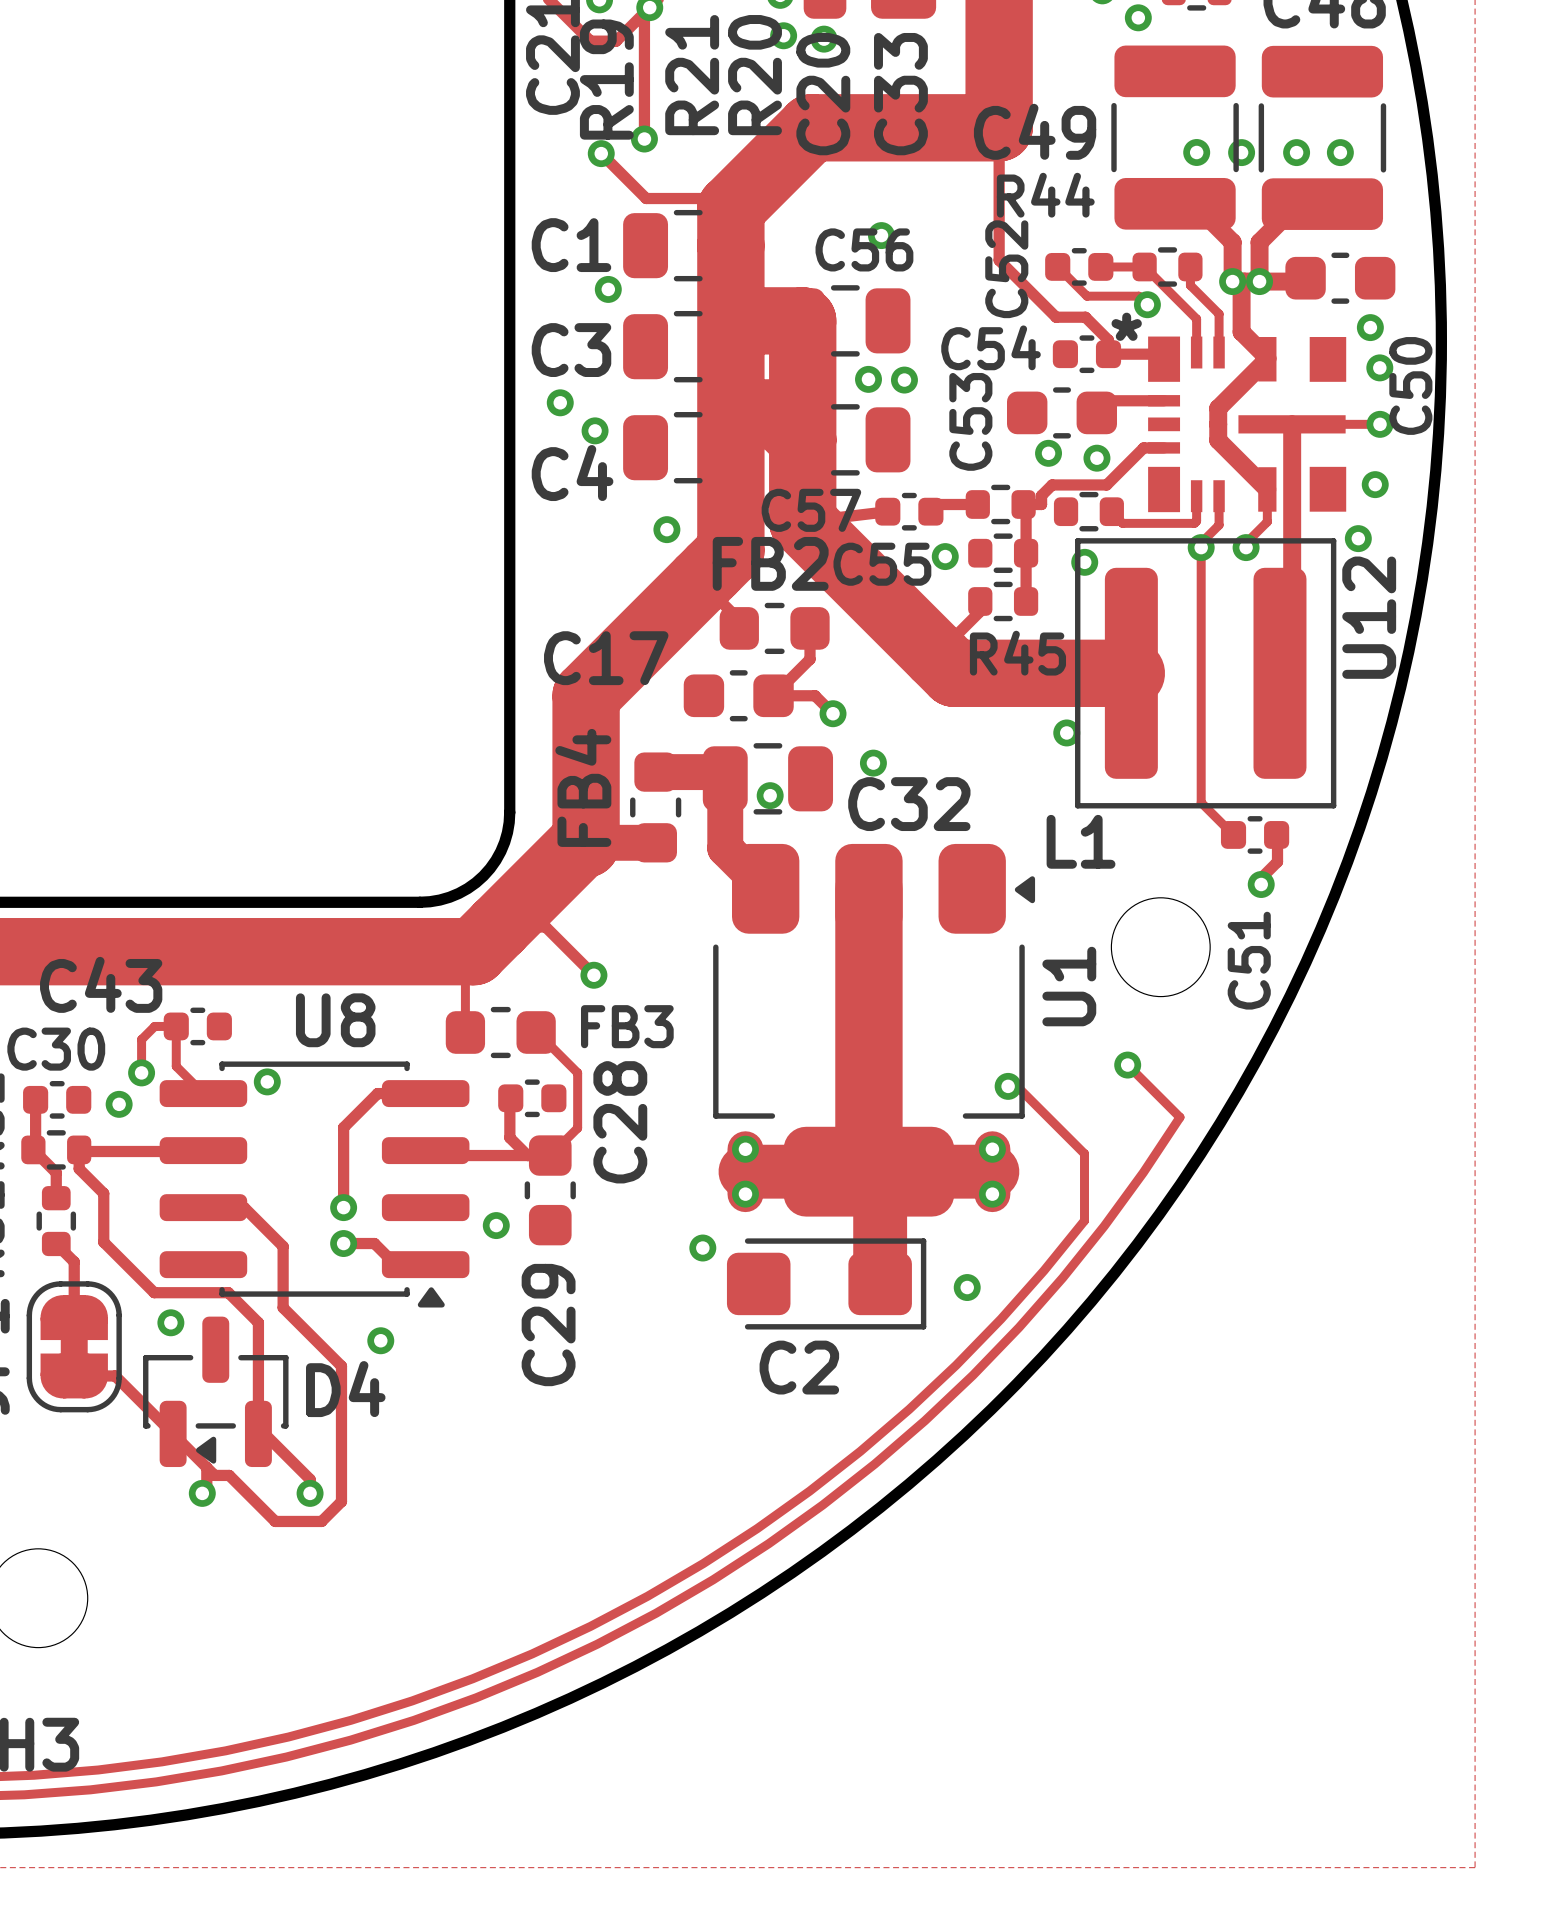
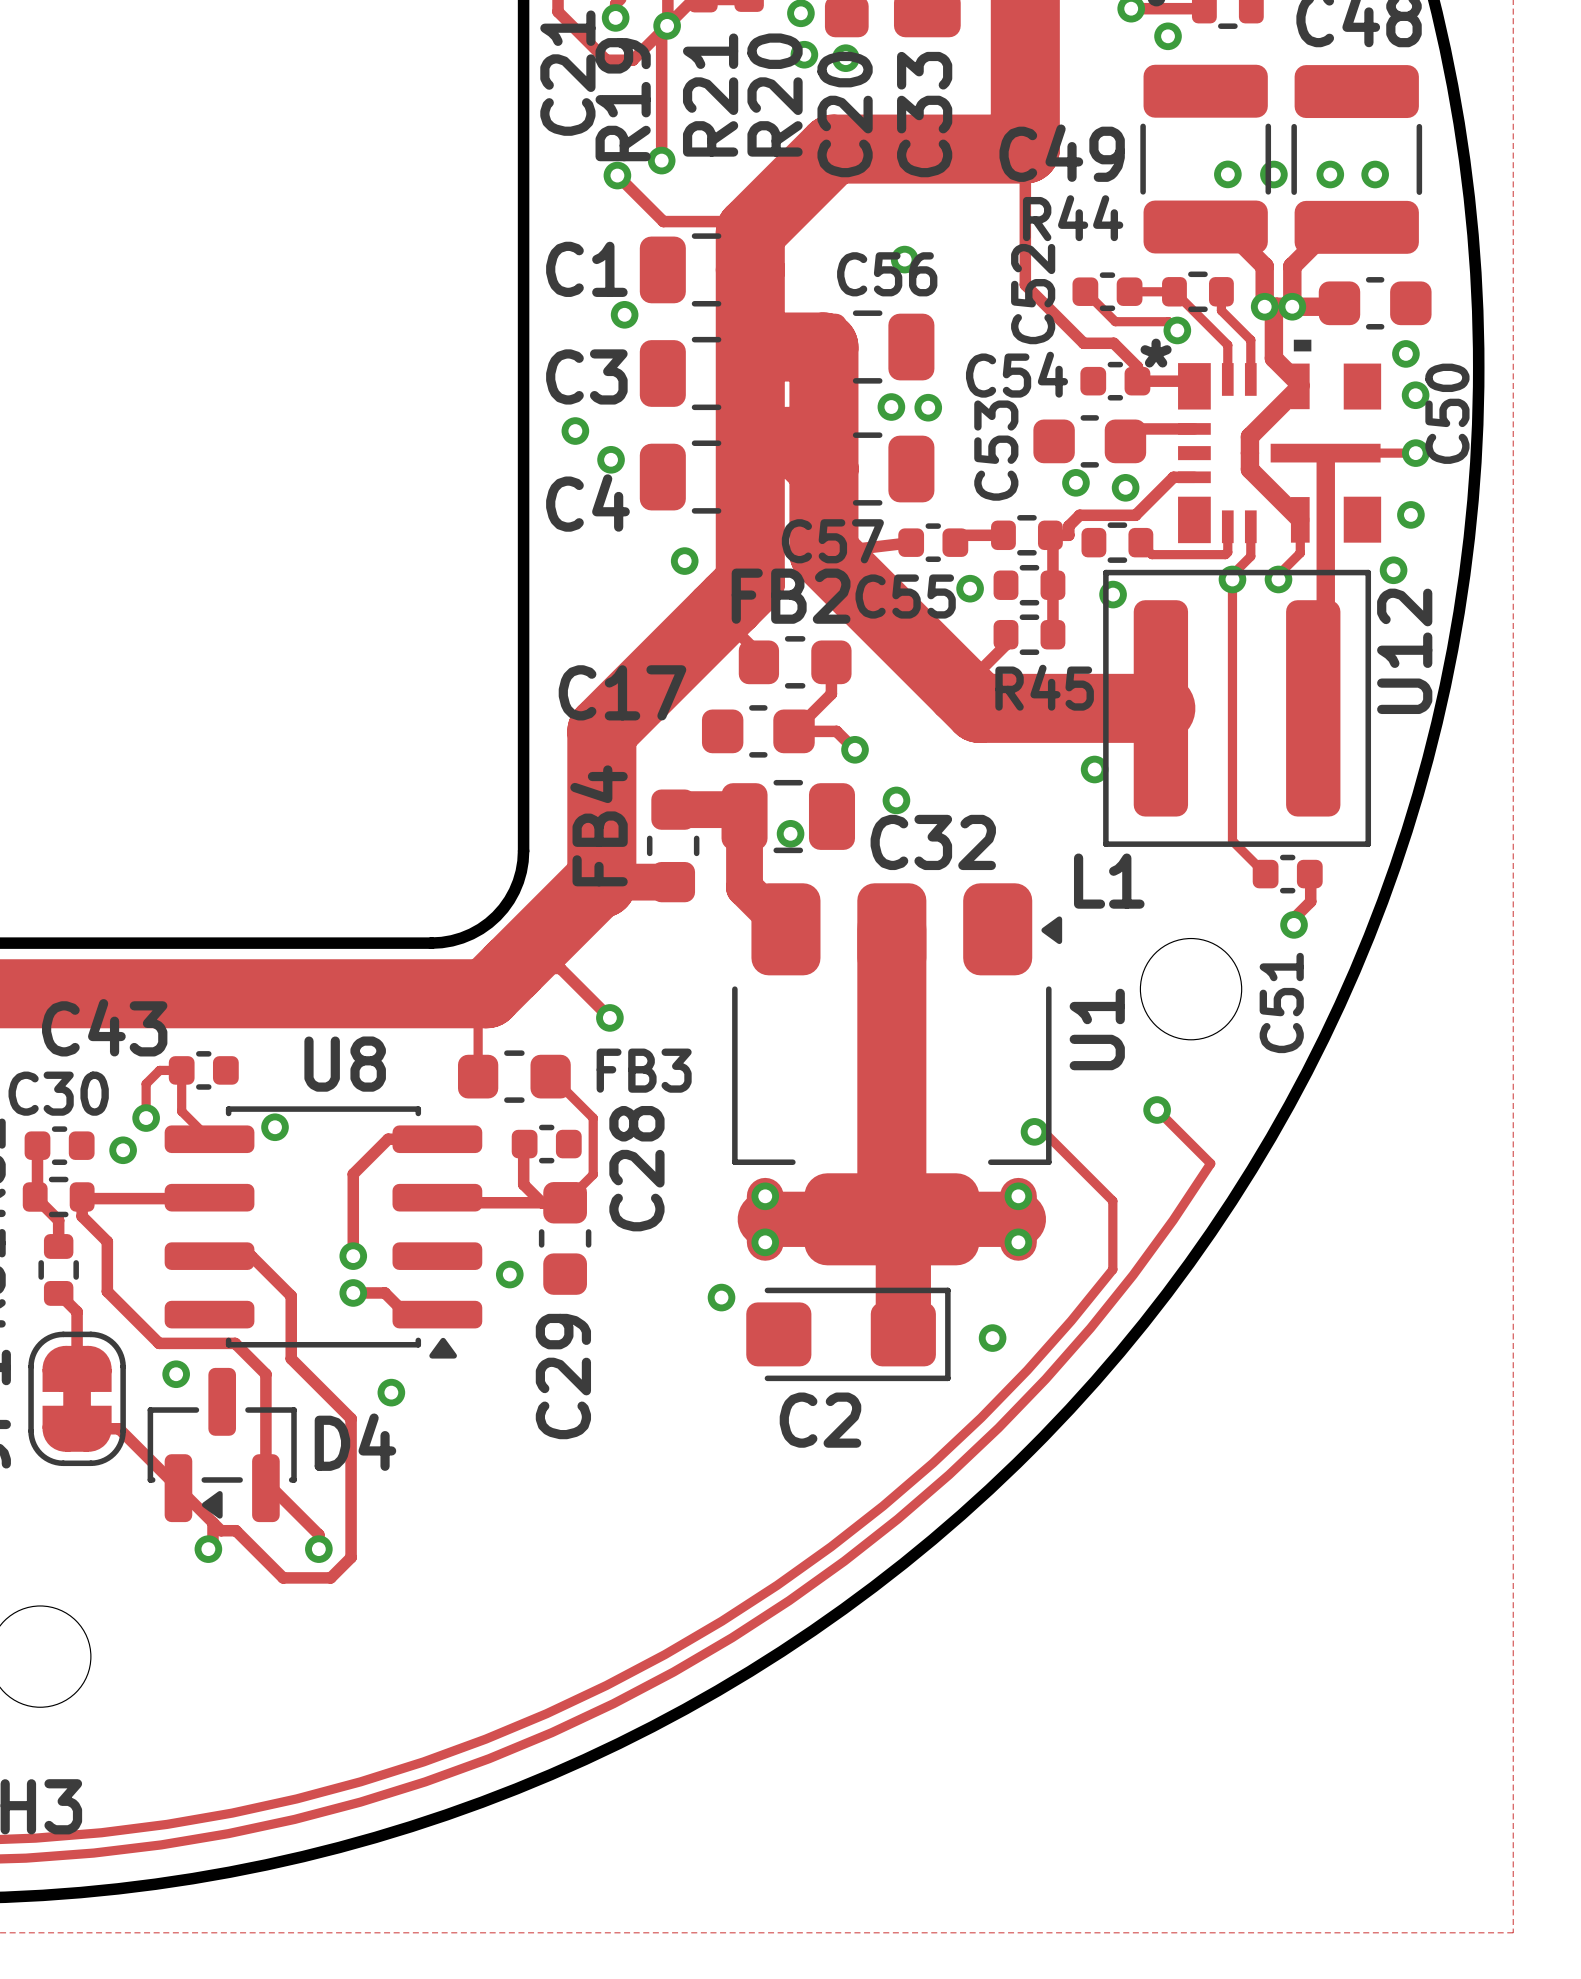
U12 footprint: [1148, 336, 1347, 513] -> [1178, 339, 1382, 544]

